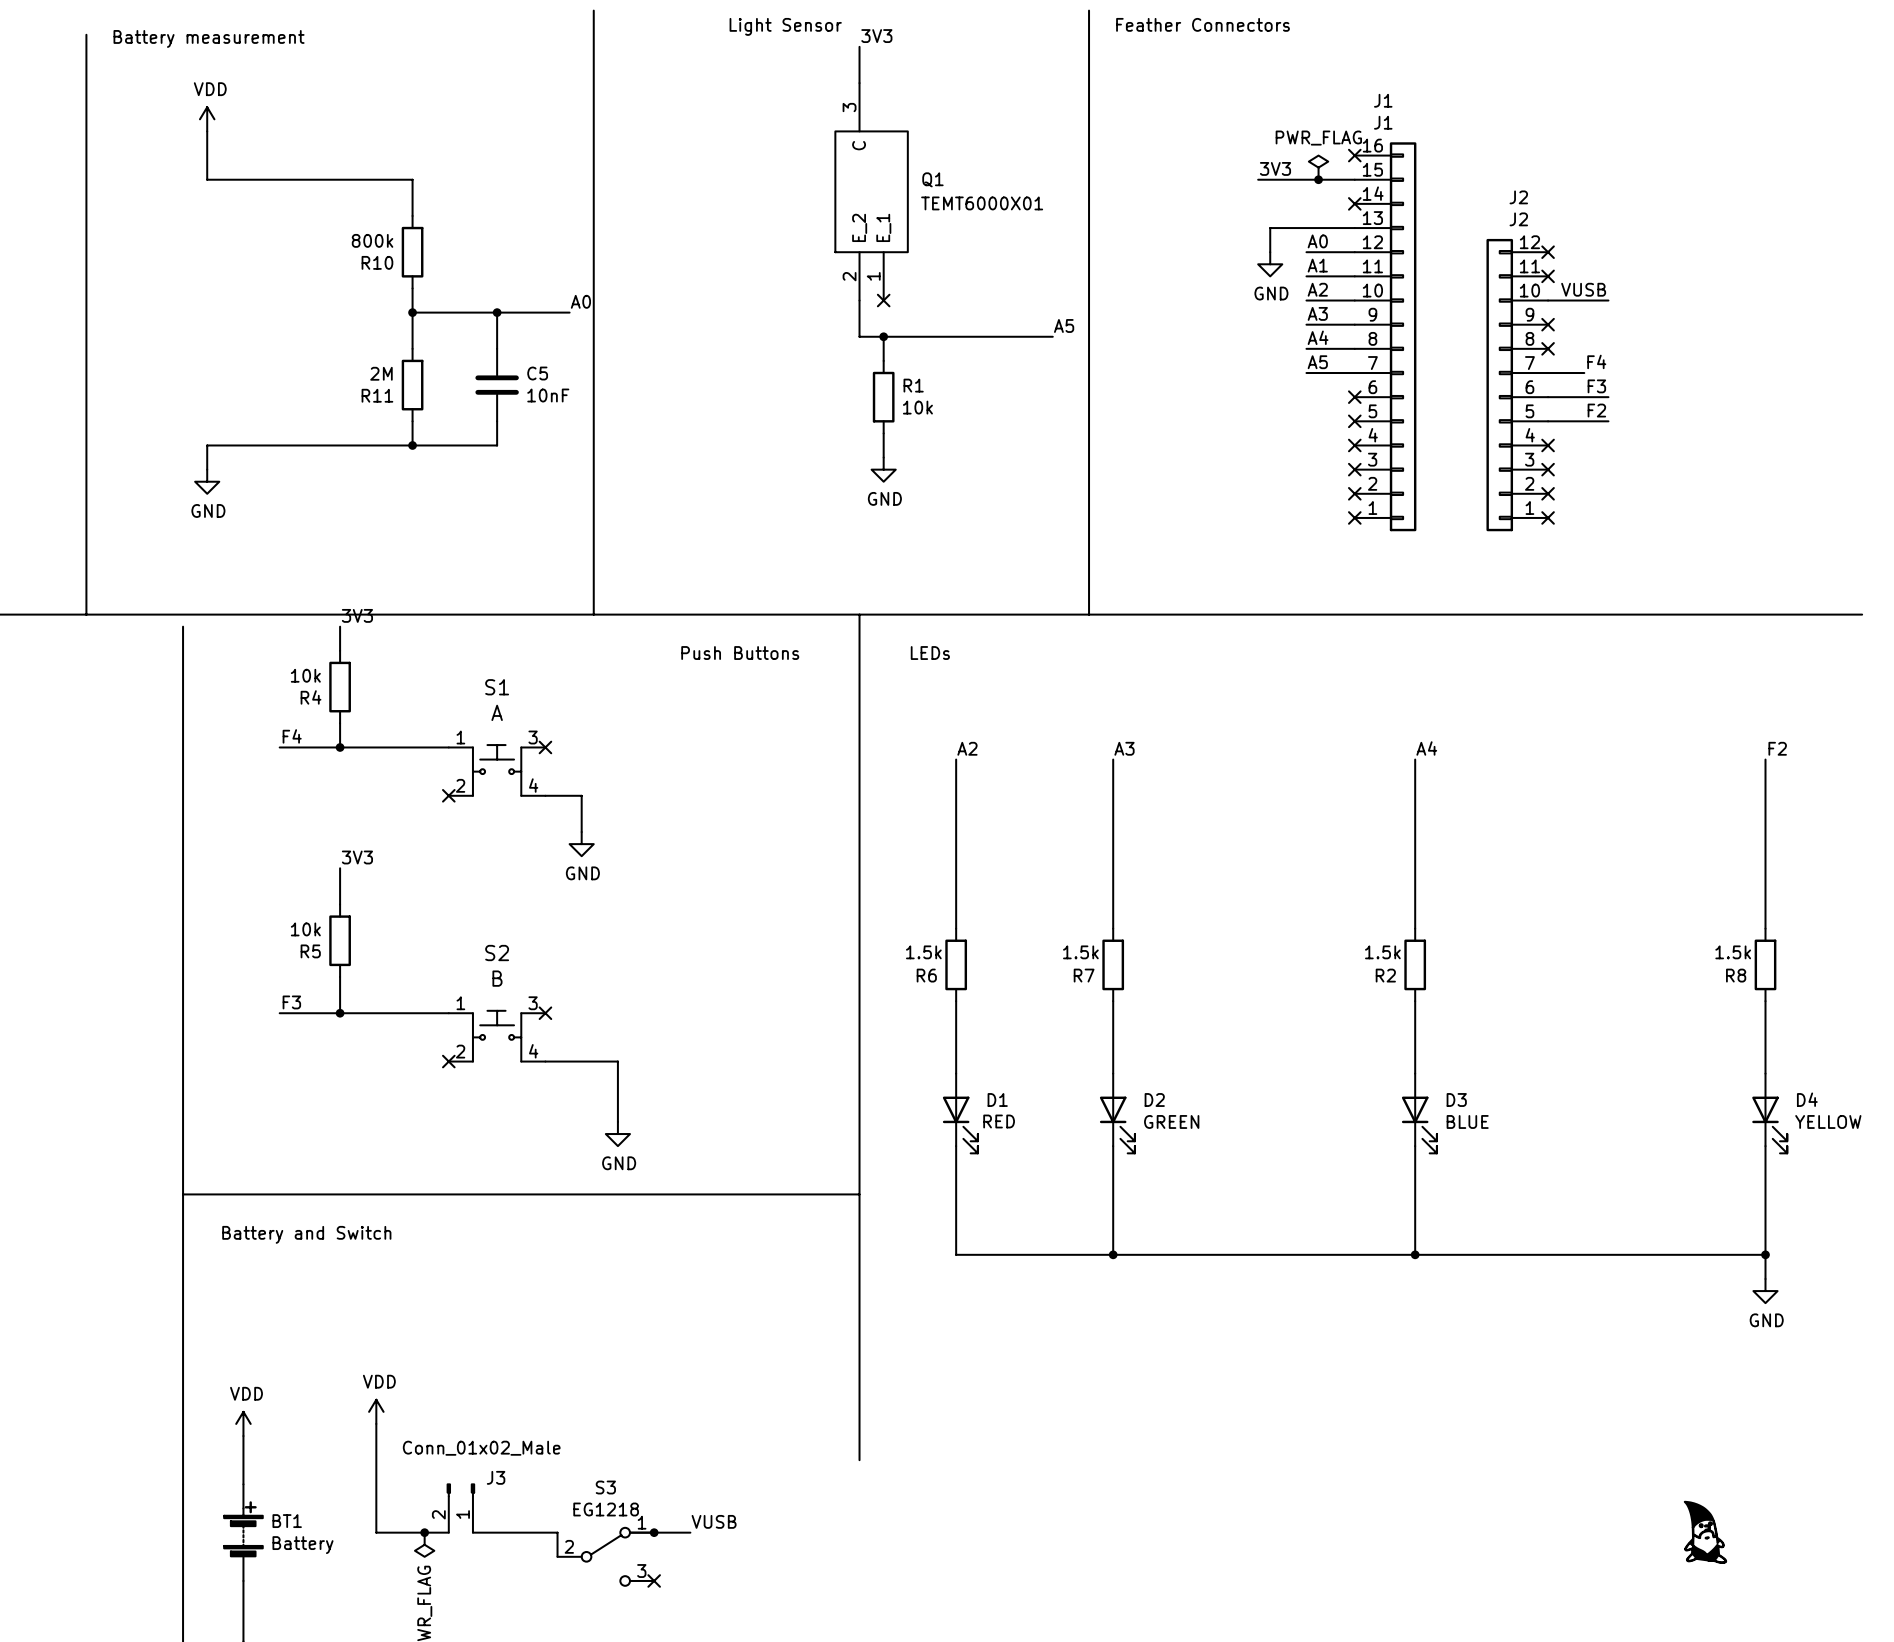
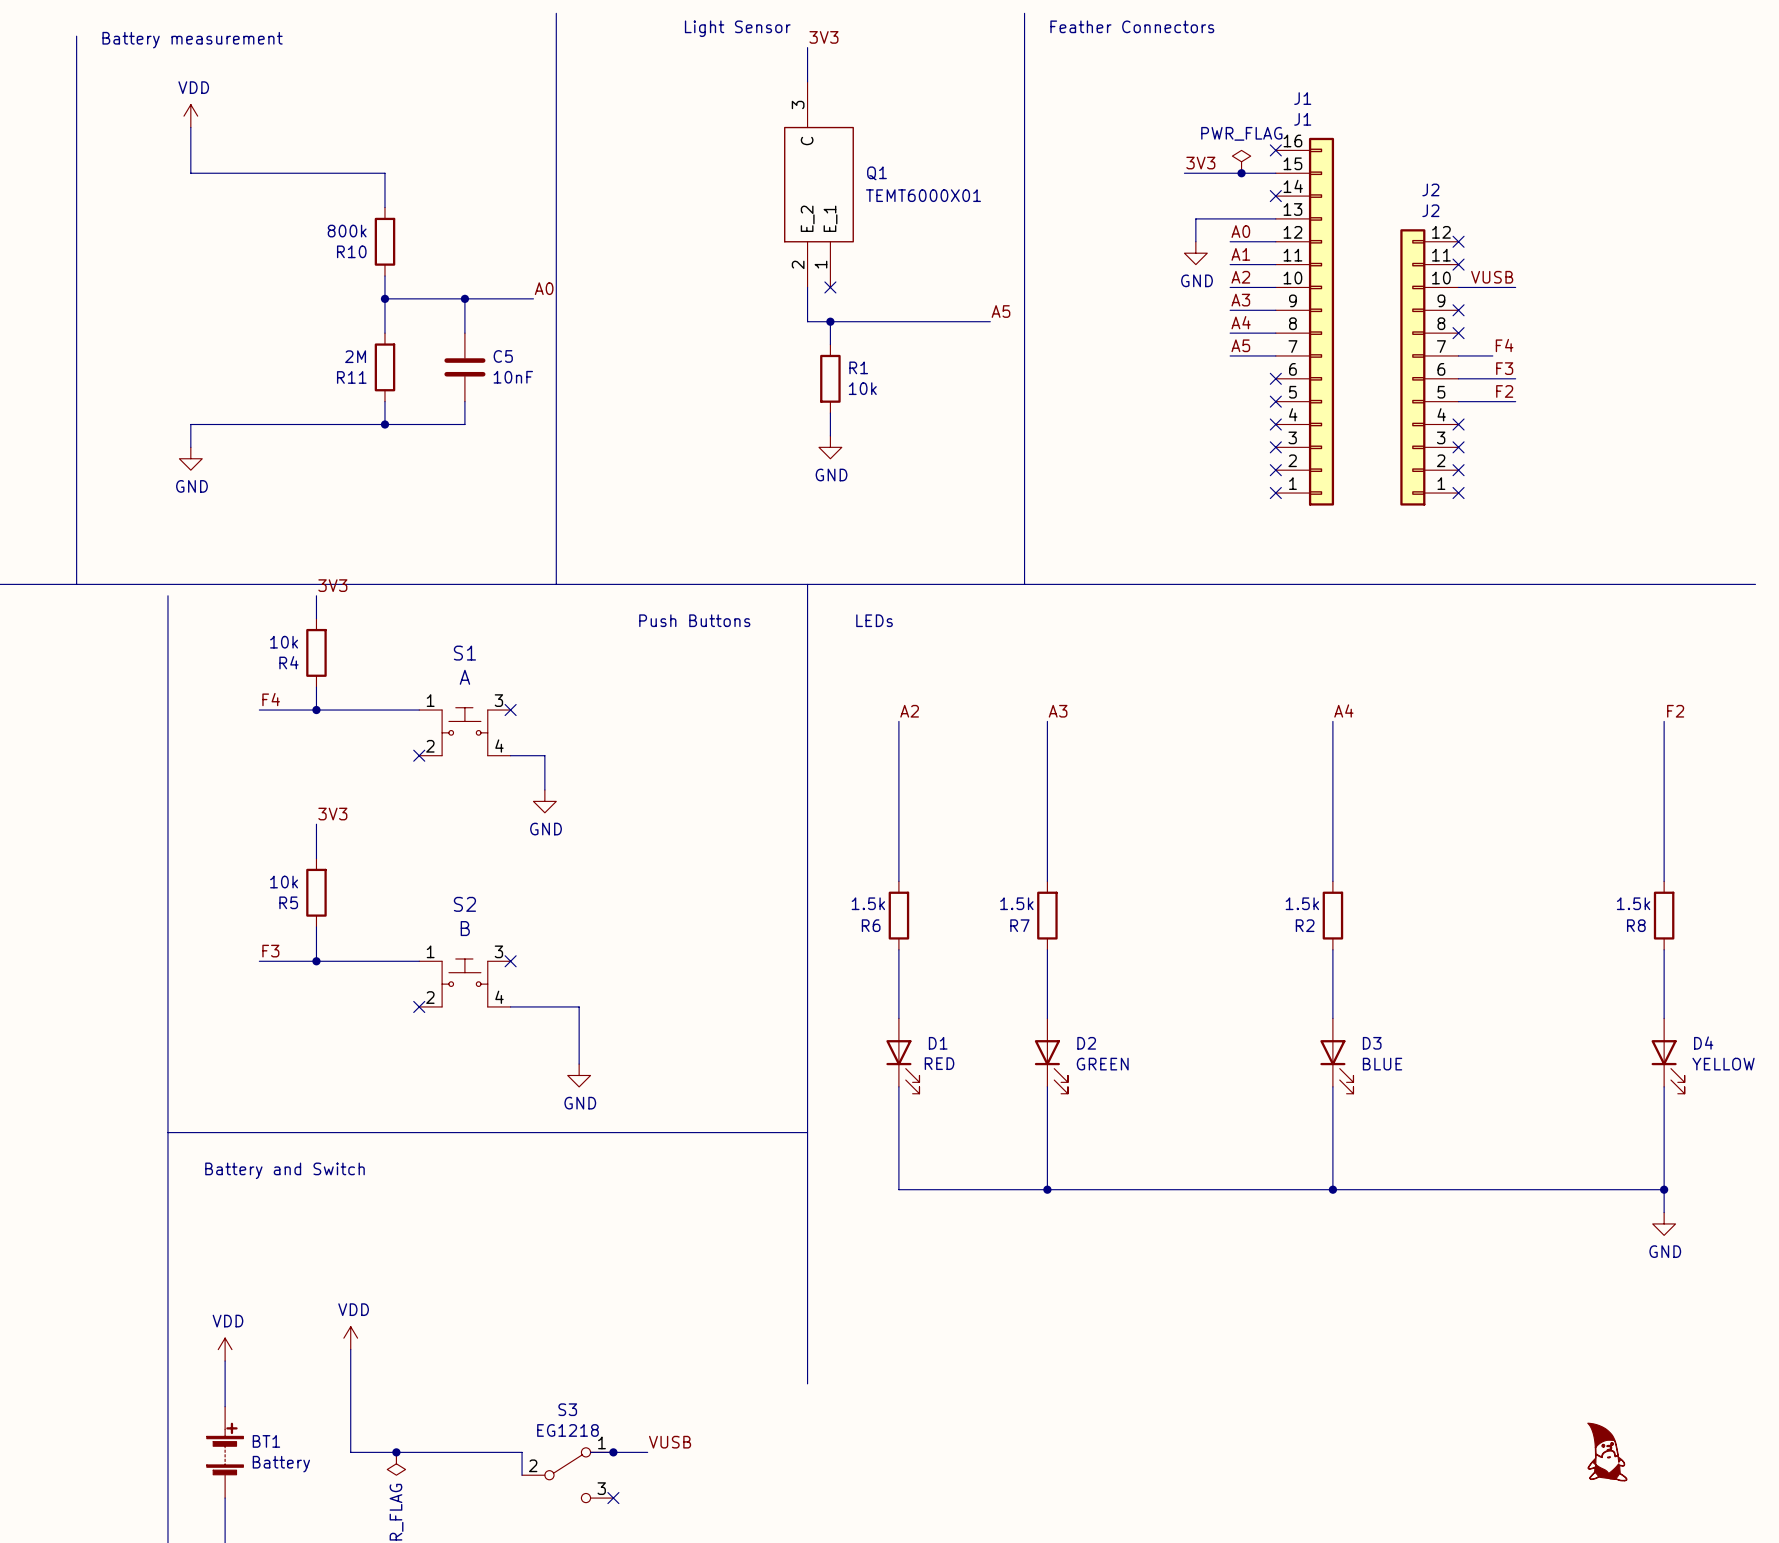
J3: Conn_01x02_Male (460, 1508) -> none
wire: none -> (419, 1452) (442, 1452)

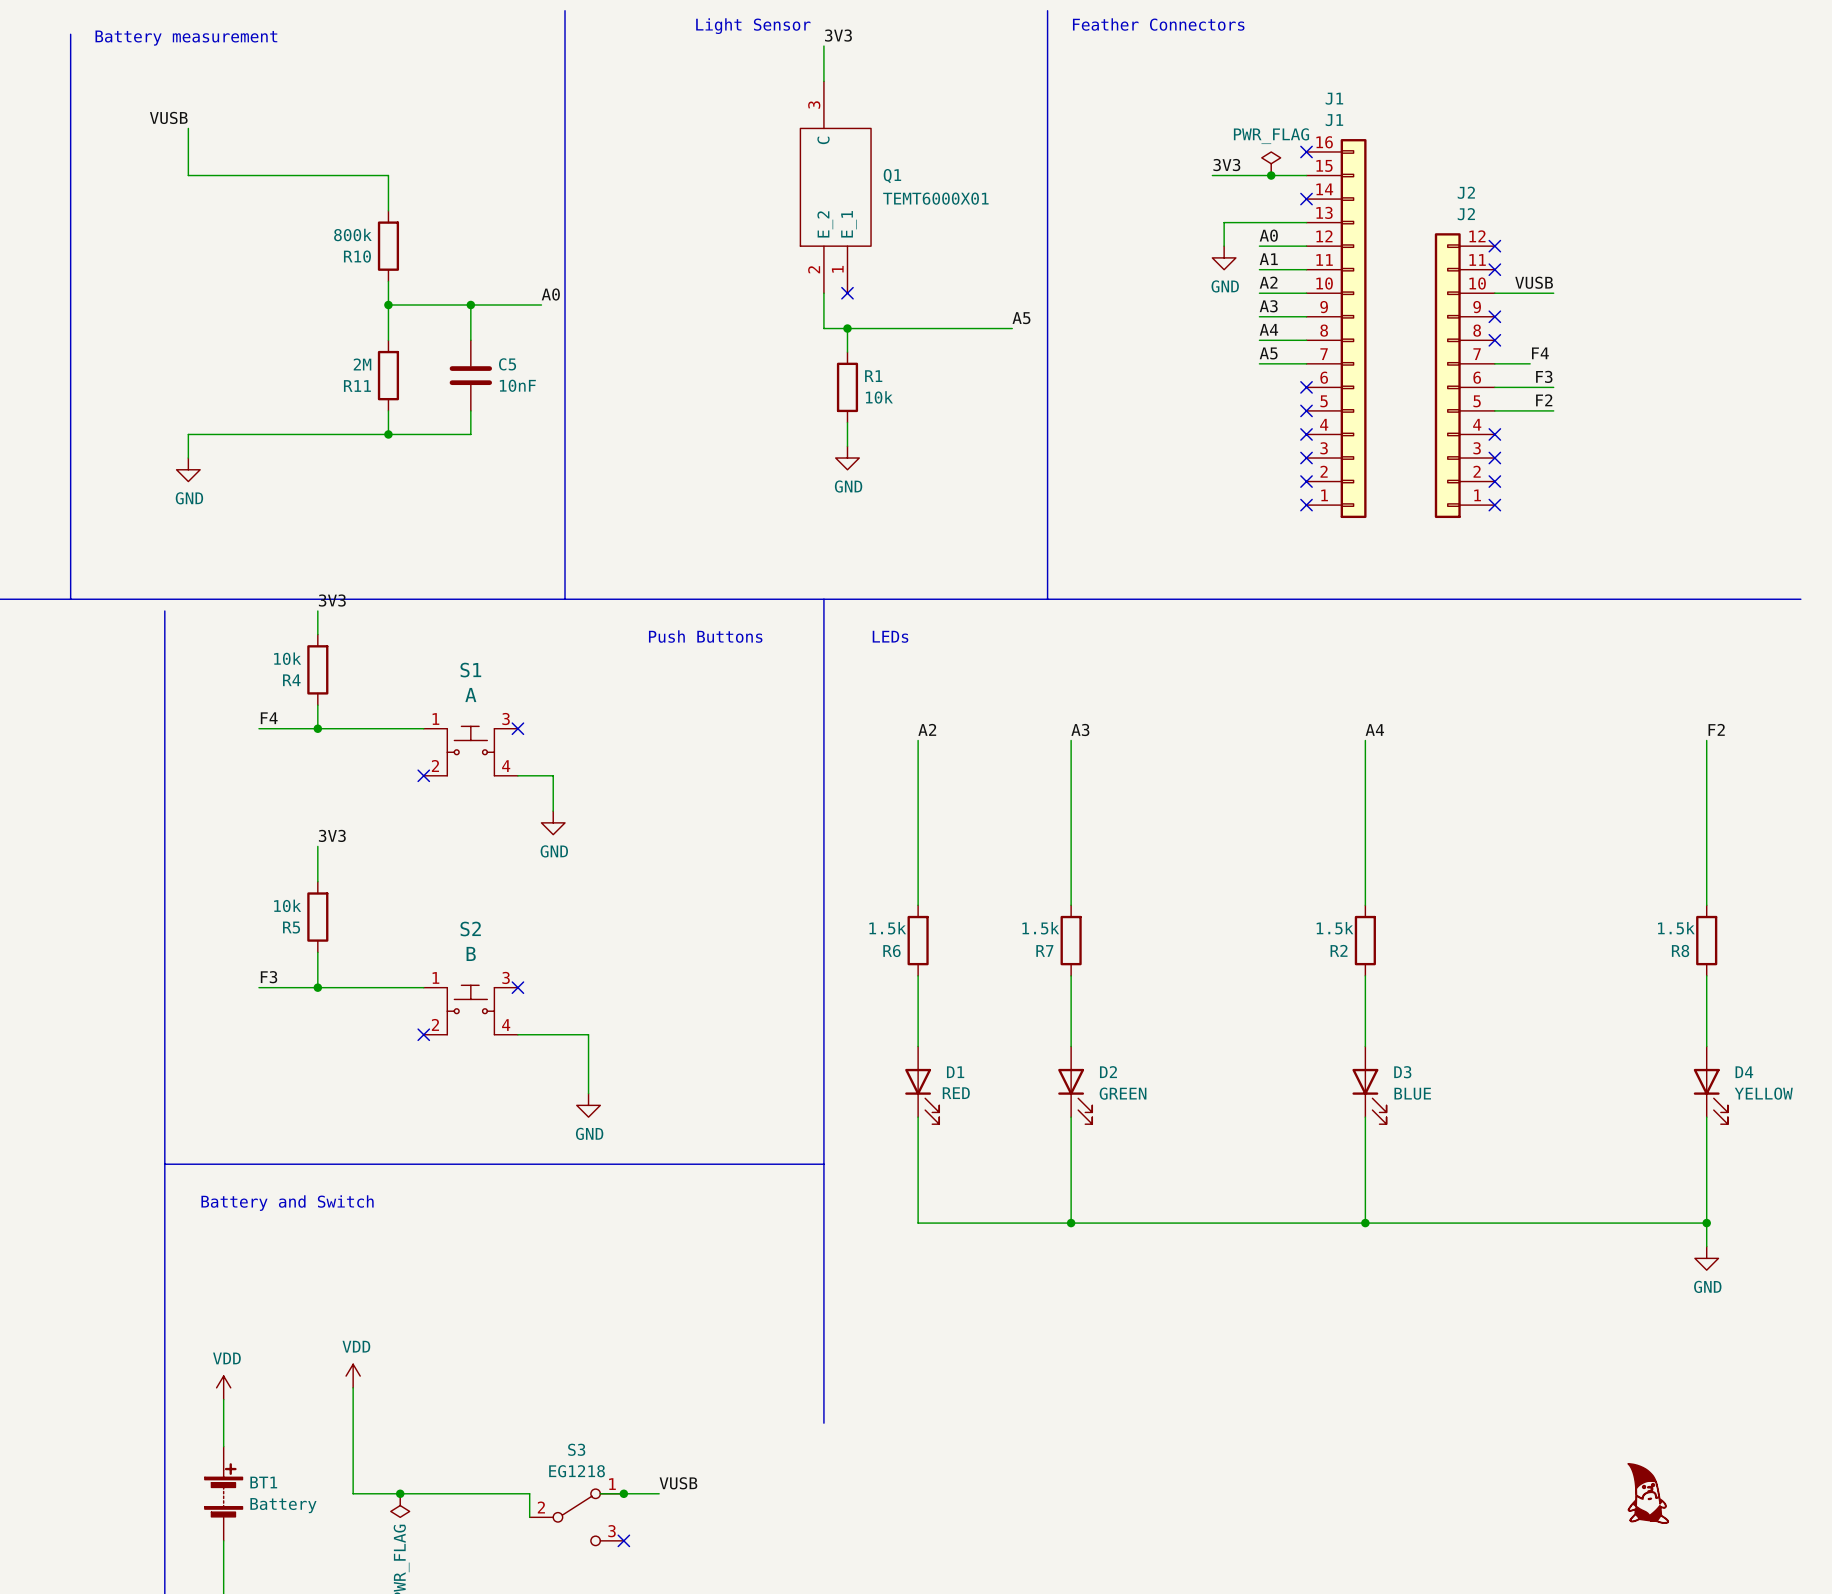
power symbol: VDD (190, 116) -> none
label: none -> VUSB (168, 117)

